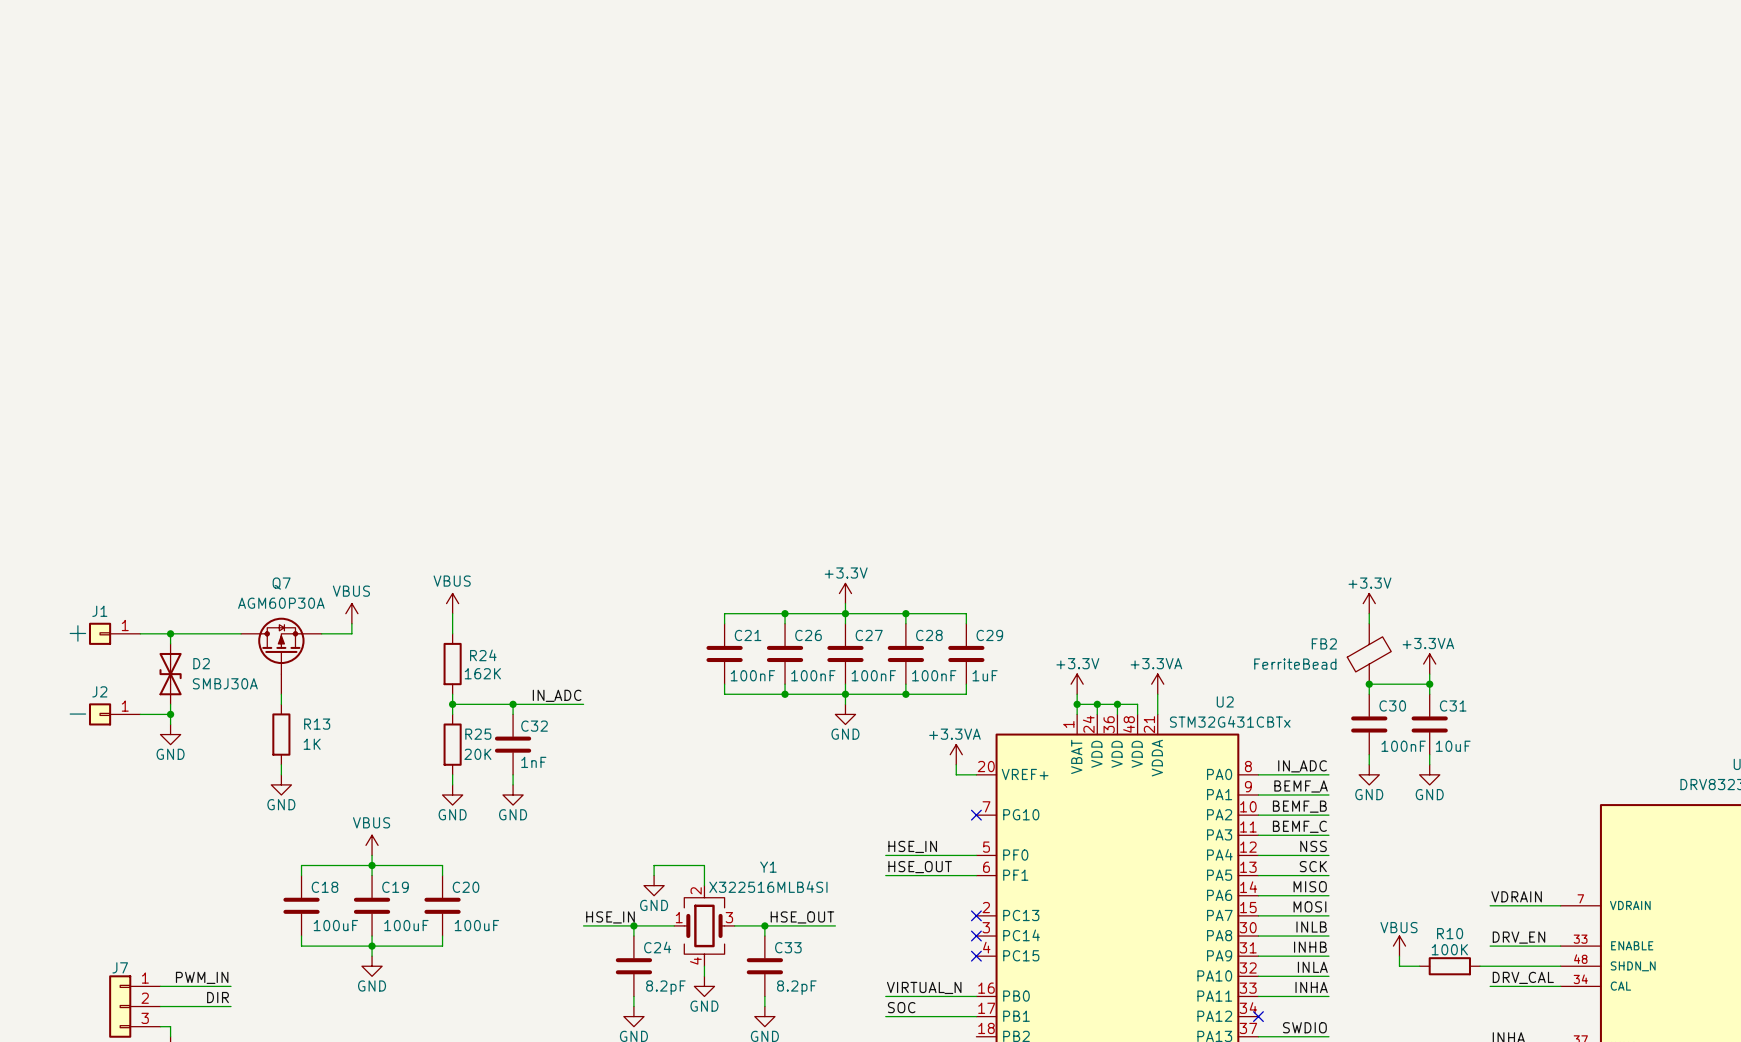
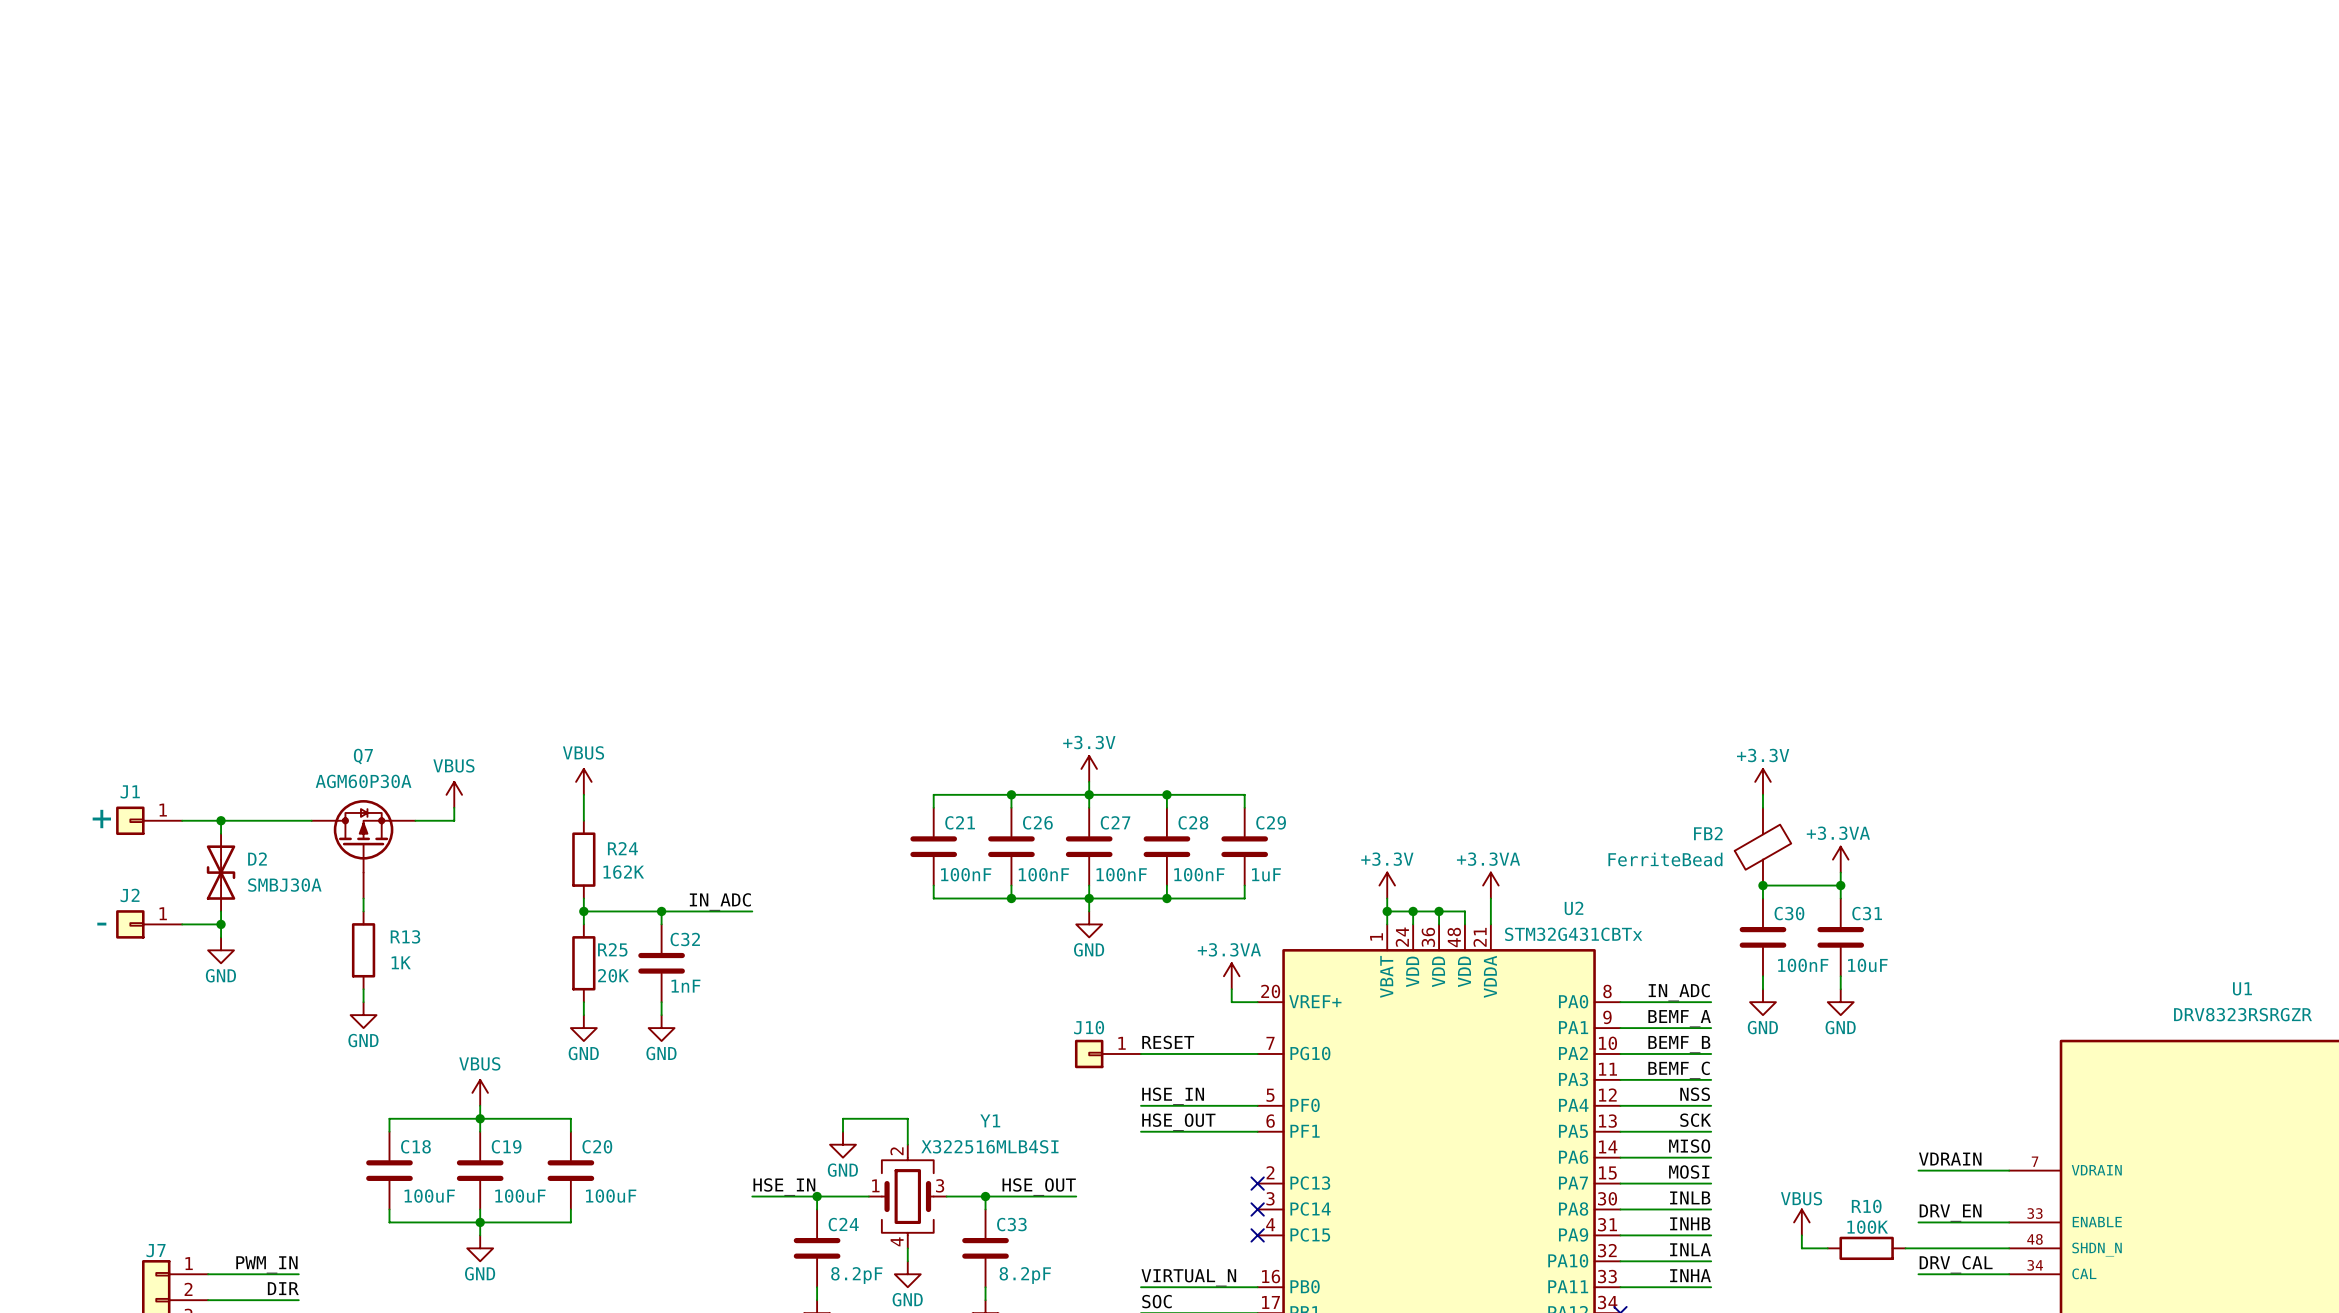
label: none -> RESET (1168, 1042)
J10: none -> (1107, 1053)
wire: none -> (1141, 1053) (1257, 1053)
no-connect mark: (976, 815) -> none

